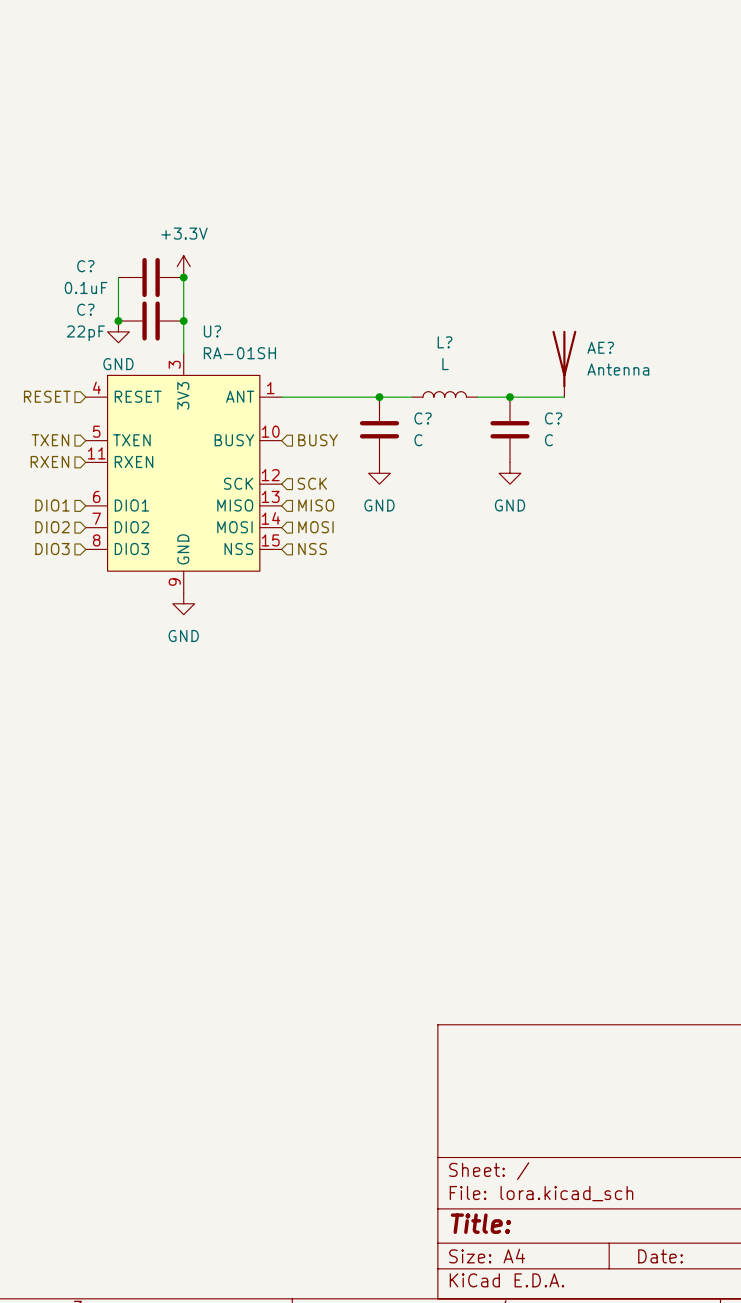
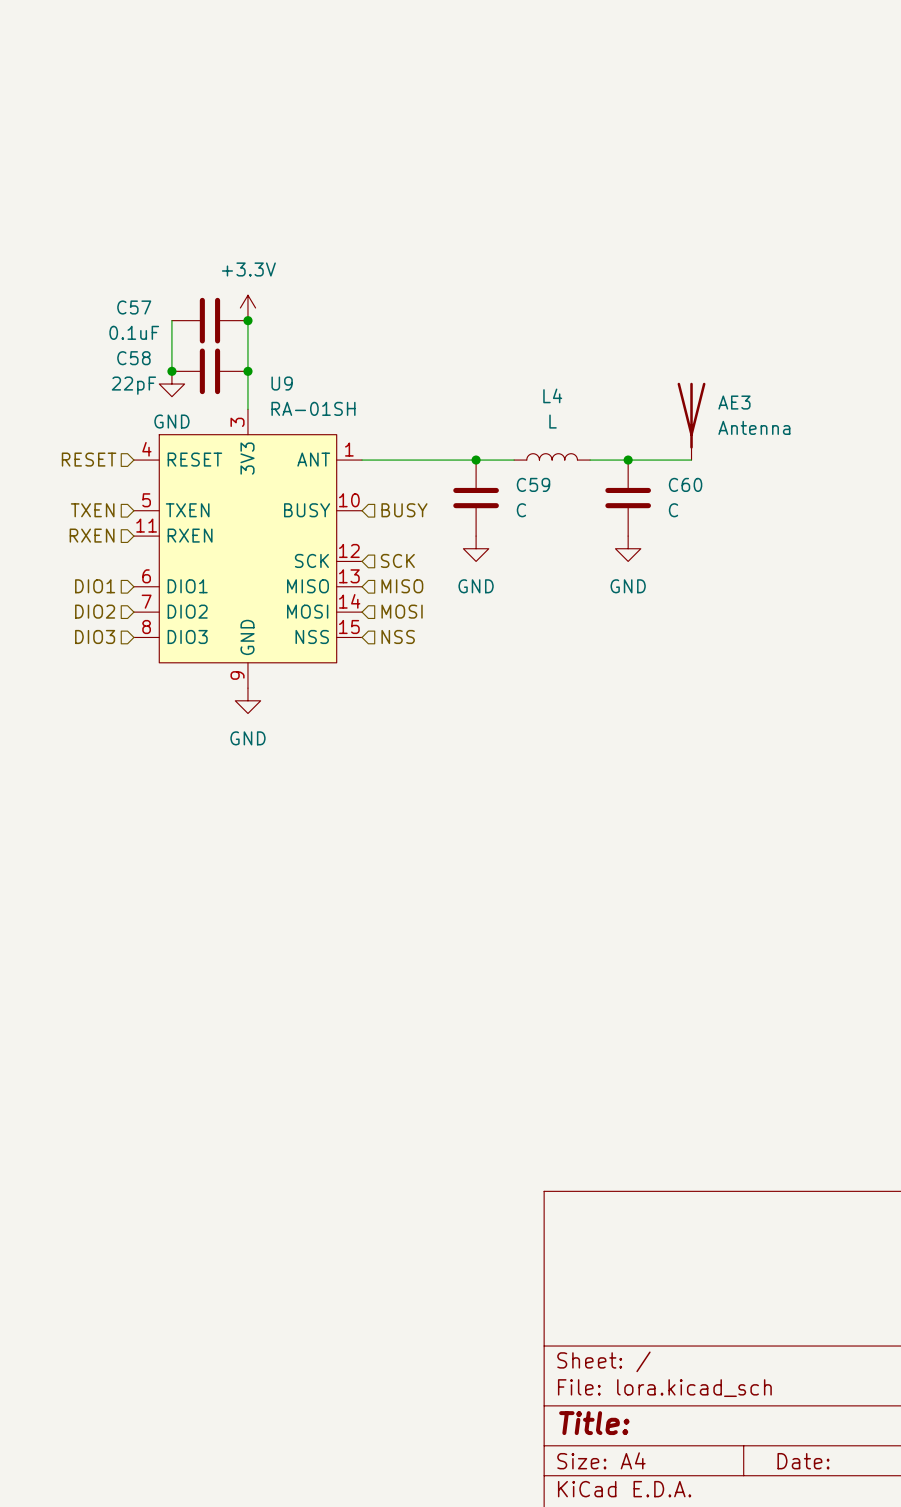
C? name: C? (85, 266) -> C57 (134, 307)
C? name: C? (85, 309) -> C58 (133, 358)
U? name: U? (212, 331) -> U9 (282, 383)
L? name: L? (445, 342) -> L4 (552, 395)
AE? name: AE? (600, 347) -> AE3 (734, 402)
C? name: C? (423, 418) -> C59 (533, 484)
C? name: C? (553, 418) -> C60 (685, 484)

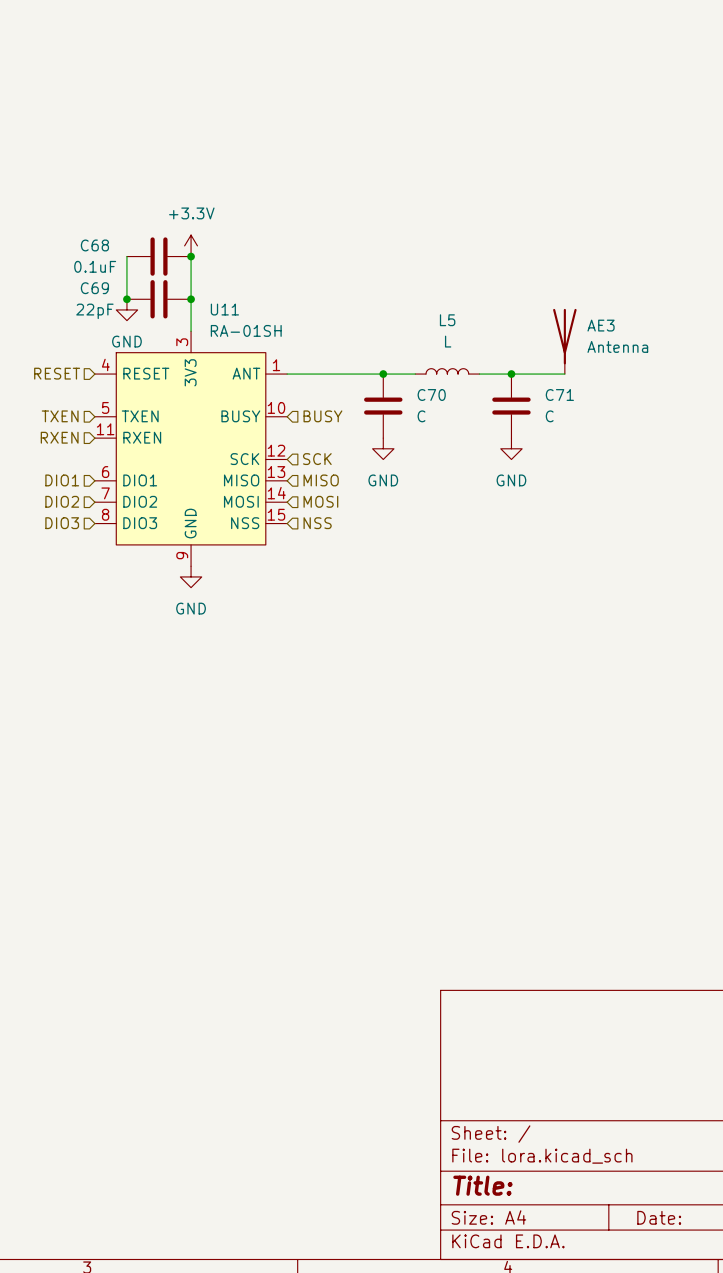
C57 name: C57 (134, 307) -> C68 (94, 245)
C58 name: C58 (133, 358) -> C69 (94, 288)
U9 name: U9 (282, 383) -> U11 (224, 309)
L4 name: L4 (552, 395) -> L5 (447, 320)
C59 name: C59 (533, 484) -> C70 (431, 395)
C60 name: C60 (685, 484) -> C71 (559, 395)

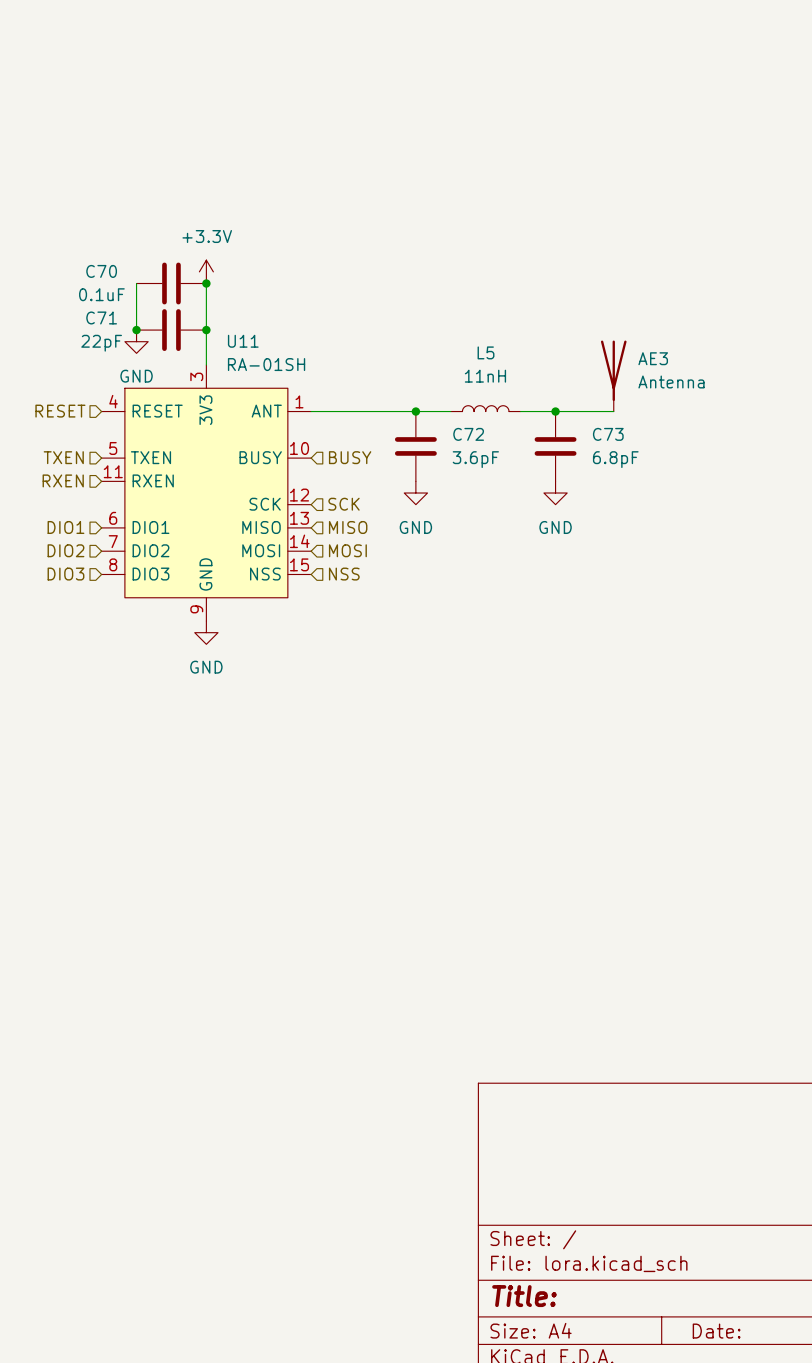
C68 name: C68 (94, 245) -> C70 (101, 271)
C69 name: C69 (94, 288) -> C71 (101, 317)
L5 value: L (448, 341) -> 11nH (485, 376)
C70 name: C70 (431, 395) -> C72 (468, 434)
C71 name: C71 (559, 395) -> C73 (608, 434)
C70 value: C (421, 416) -> 3.6pF (475, 459)
C71 value: C (549, 416) -> 6.8pF (615, 459)

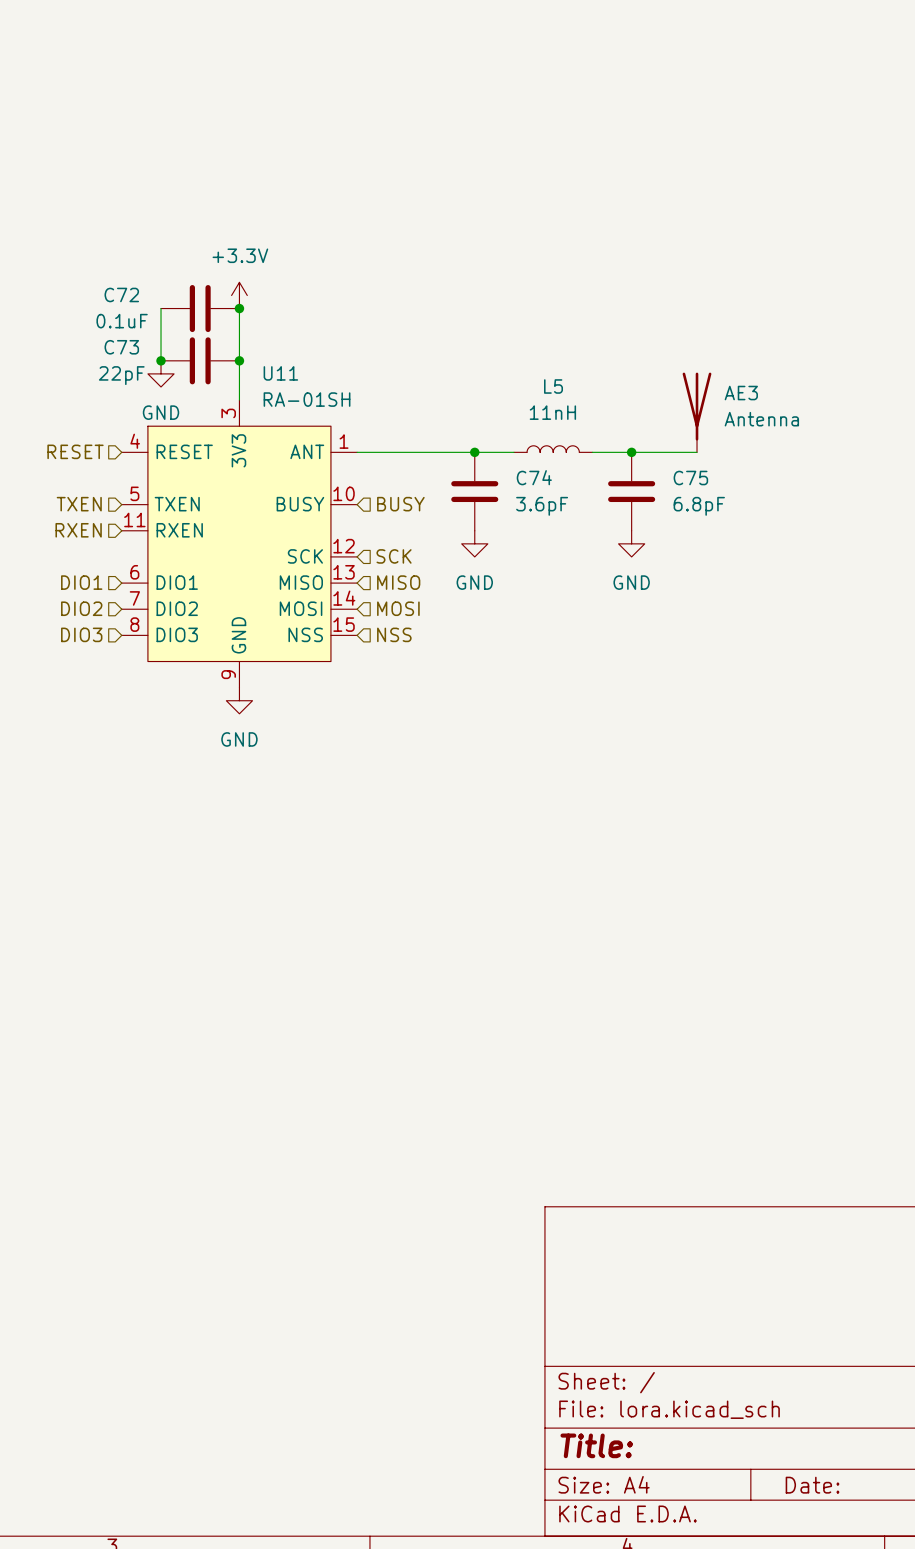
C70 name: C70 (101, 271) -> C72 (121, 294)
C71 name: C71 (101, 317) -> C73 (121, 347)
C72 name: C72 (468, 434) -> C74 (534, 477)
C73 name: C73 (608, 434) -> C75 (690, 478)

